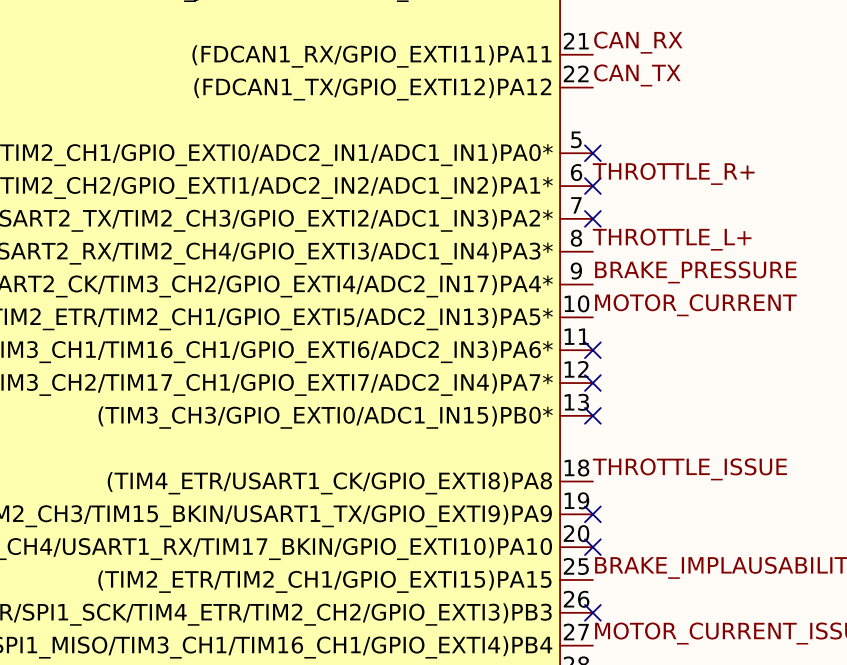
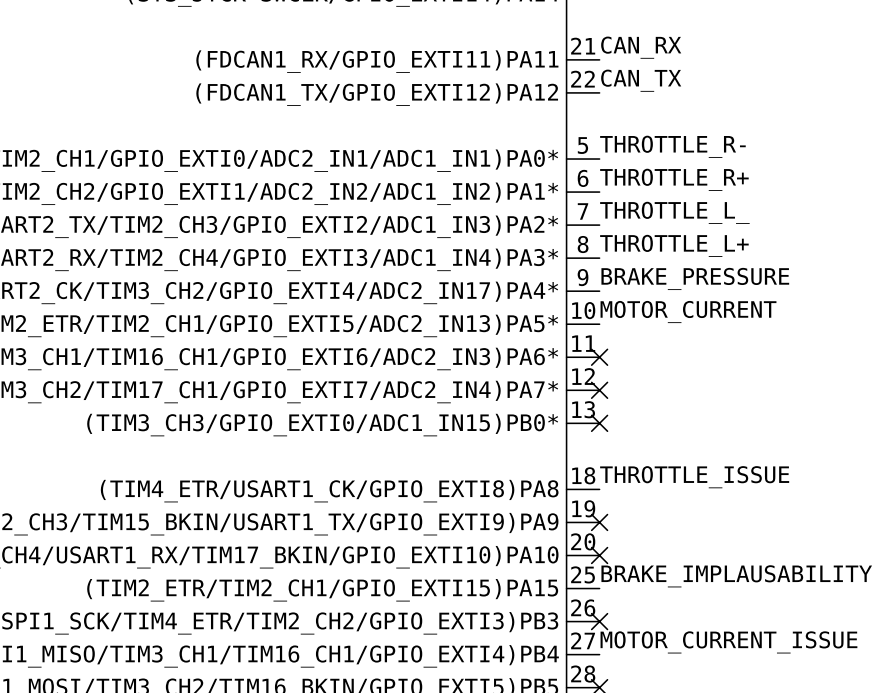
label: none -> THROTTLE_R- (672, 146)
no-connect mark: (592, 153) -> none
no-connect mark: (592, 186) -> none
label: none -> THROTTLE_L_ (674, 212)
no-connect mark: (592, 218) -> none

